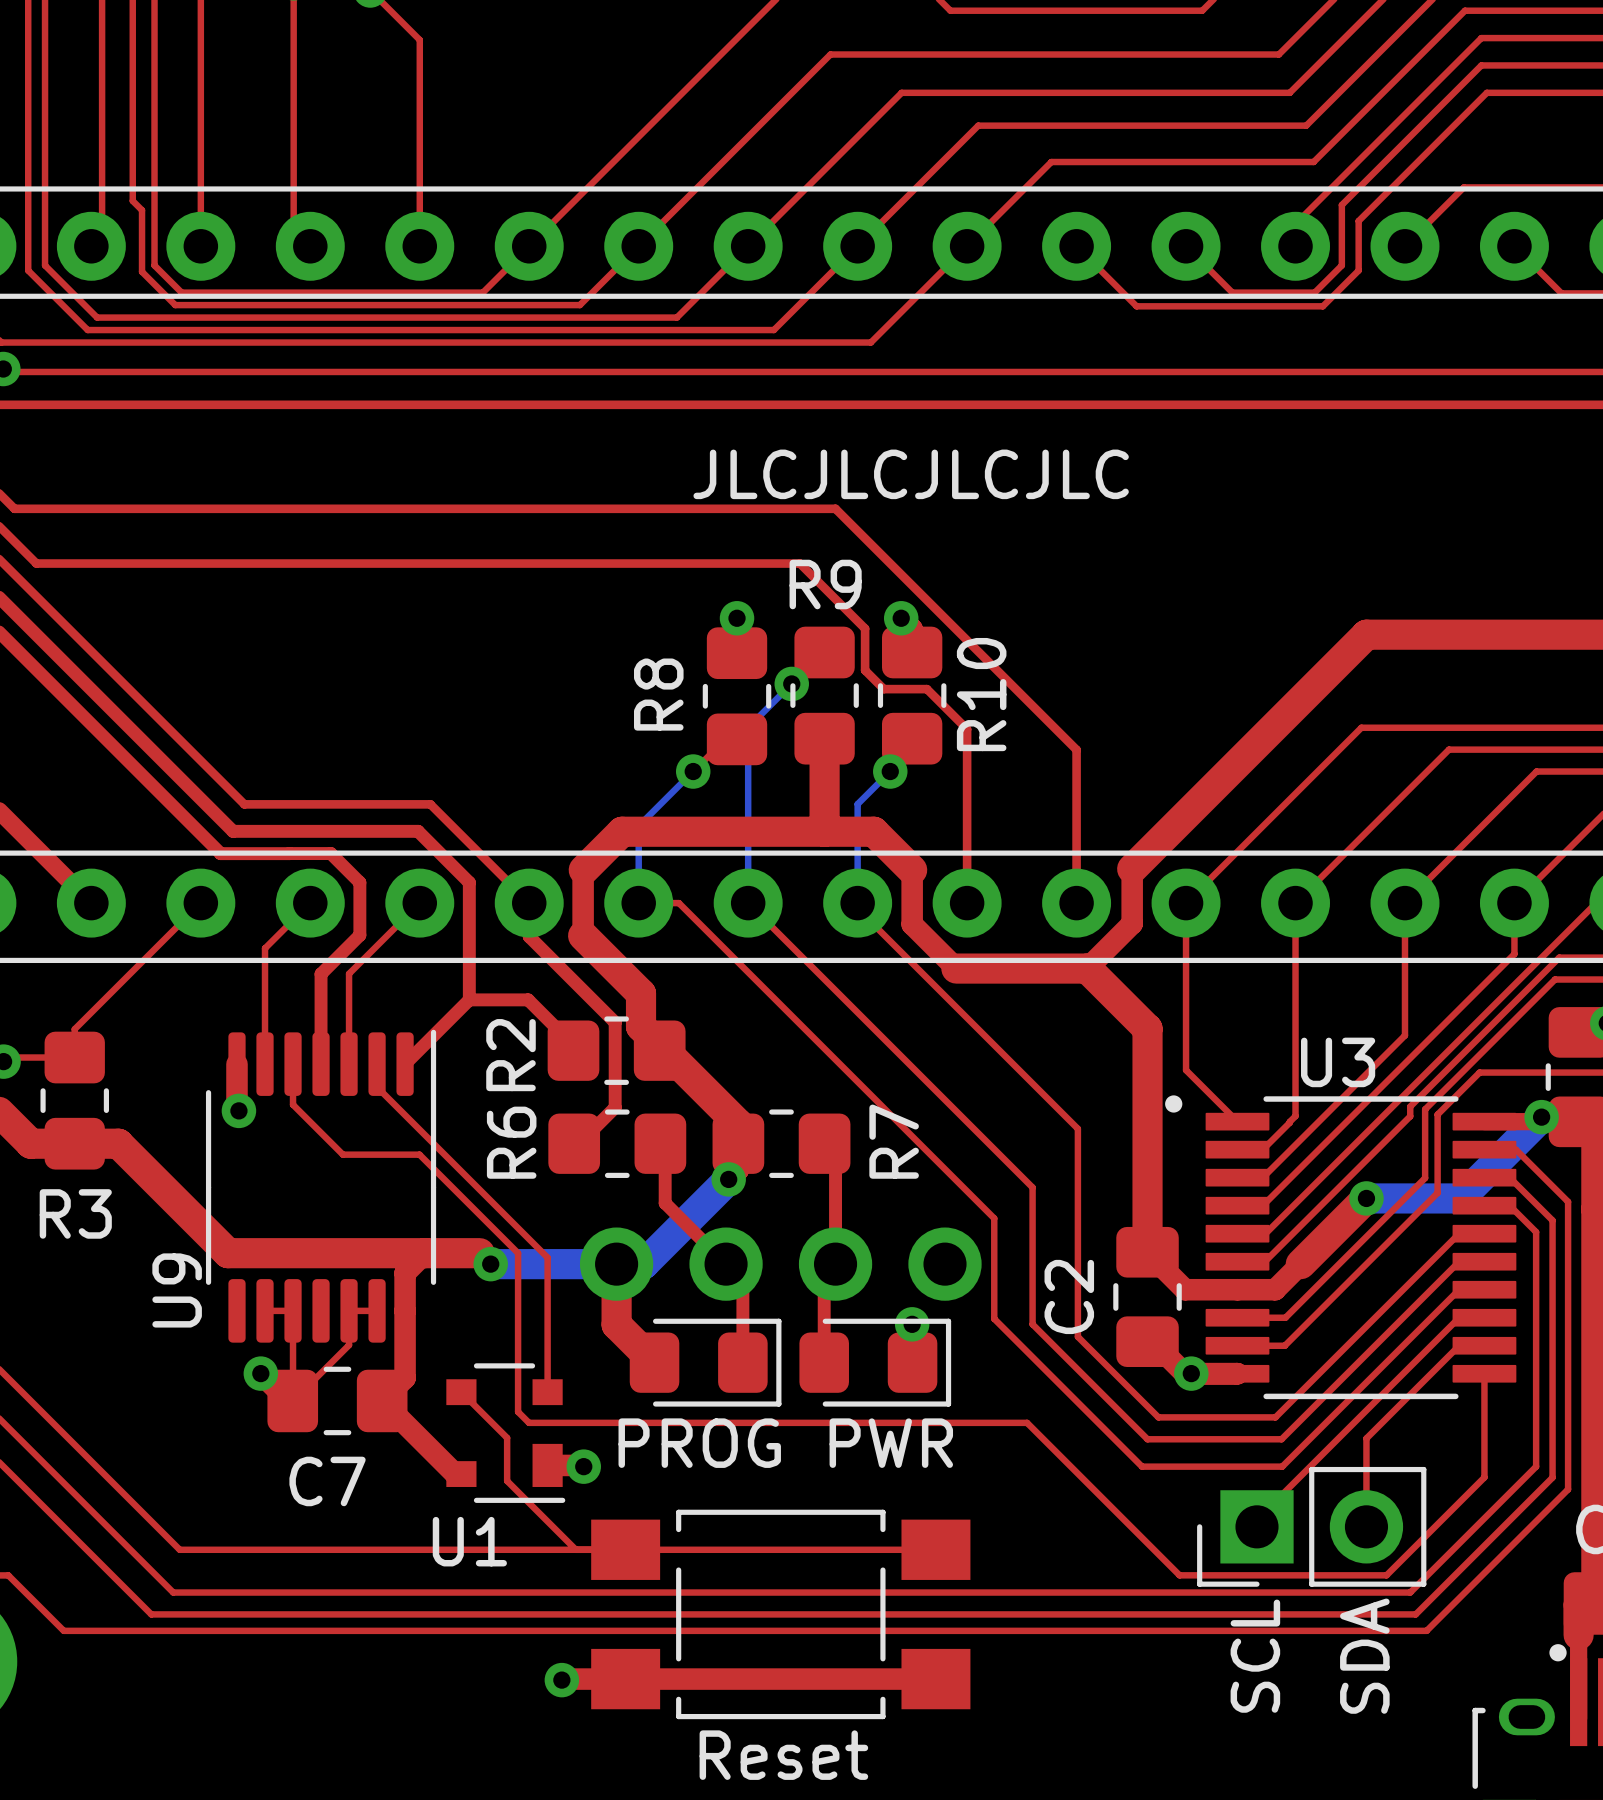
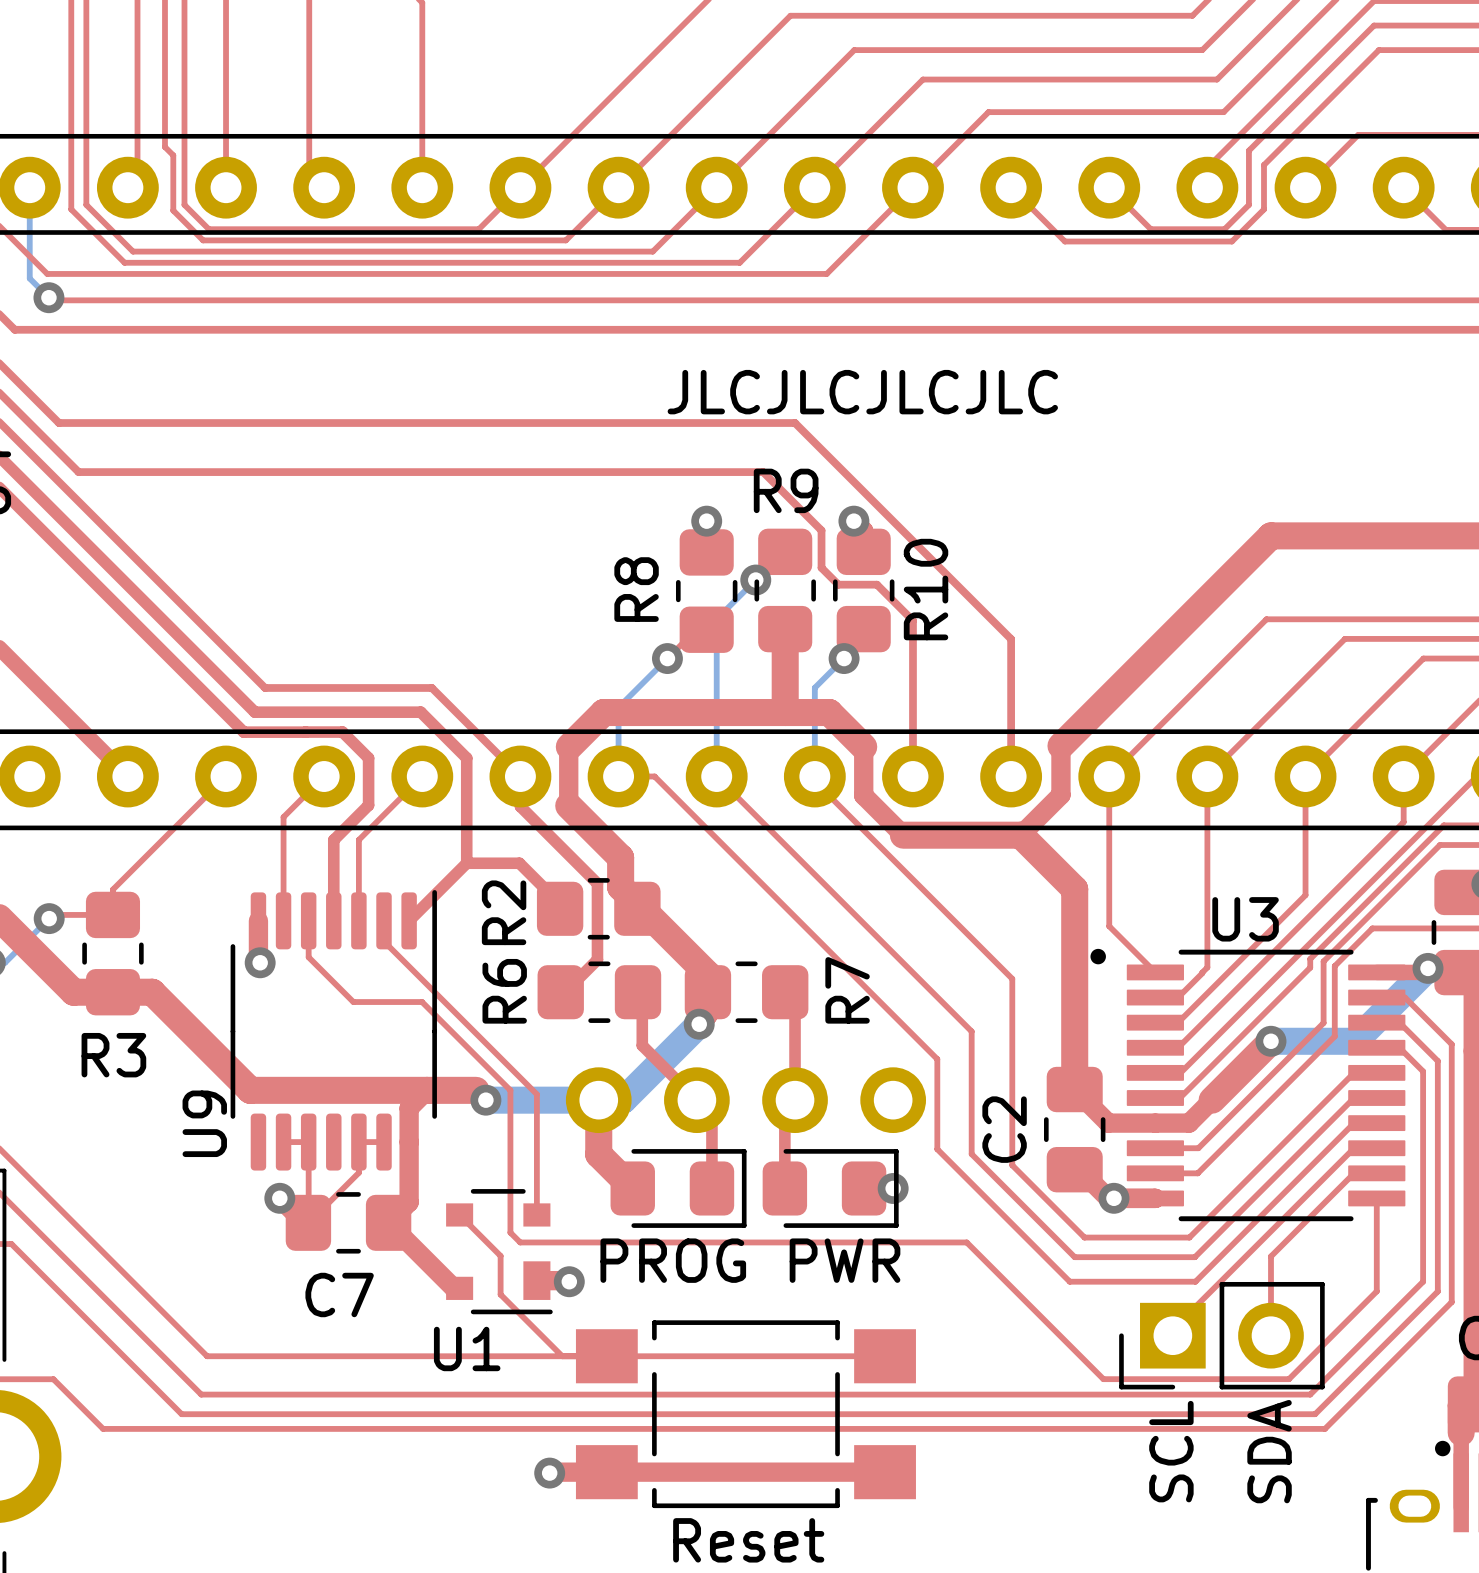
via position: (912, 1324) -> (893, 1188)

